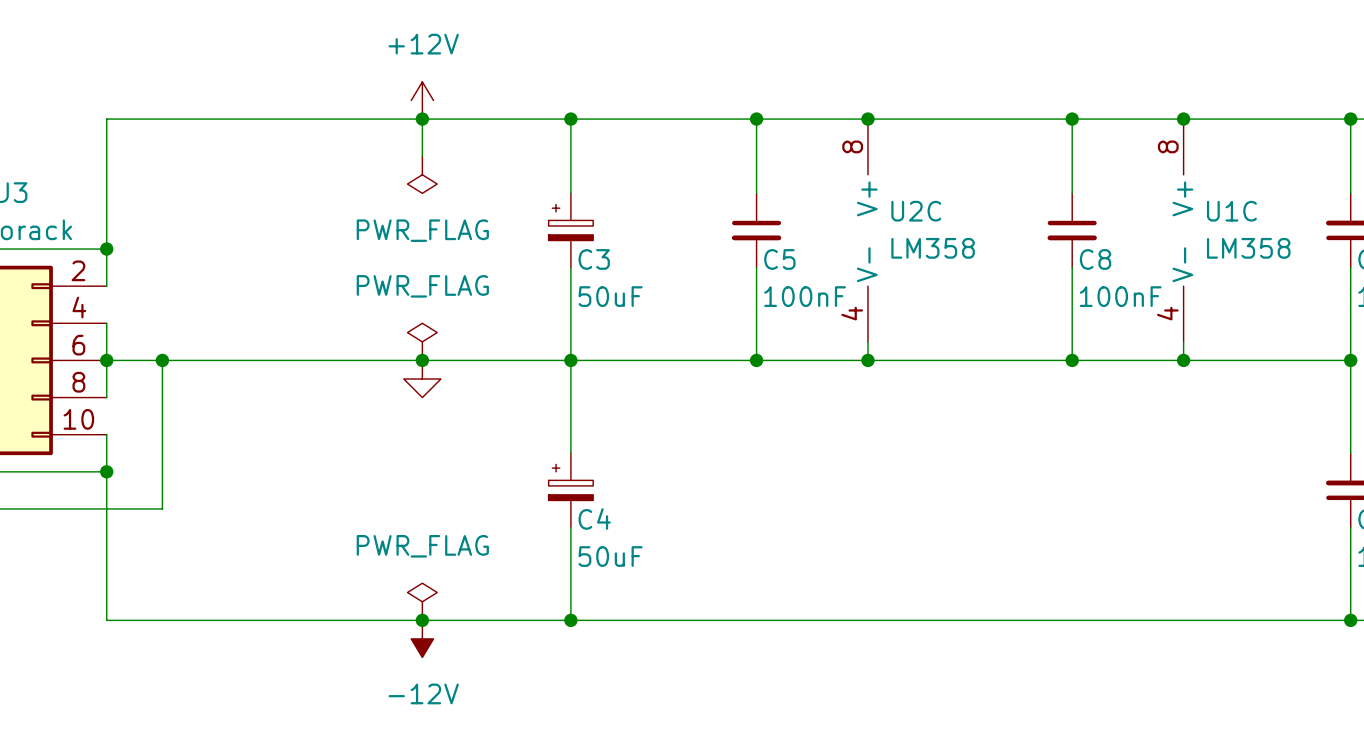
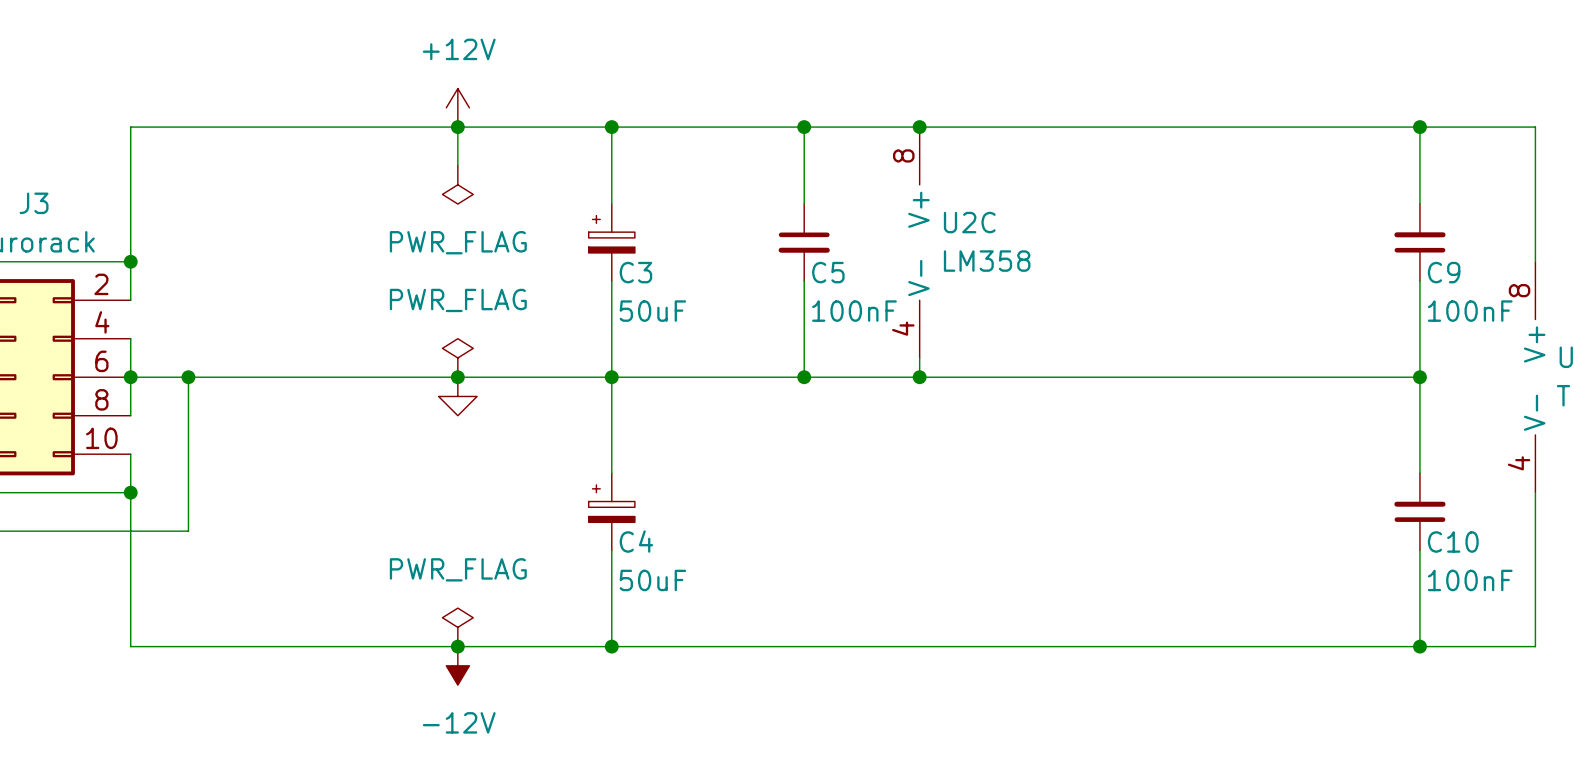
wire: (1072, 119) (1072, 193) -> none
junction: (1072, 119) -> none
junction: (1183, 119) -> none
C8: 100nF (1072, 230) -> none
U1C: LM358 (1183, 230) -> none
wire: (1072, 267) (1072, 360) -> none
wire: (1183, 341) (1183, 360) -> none
junction: (1072, 360) -> none
junction: (1183, 360) -> none

